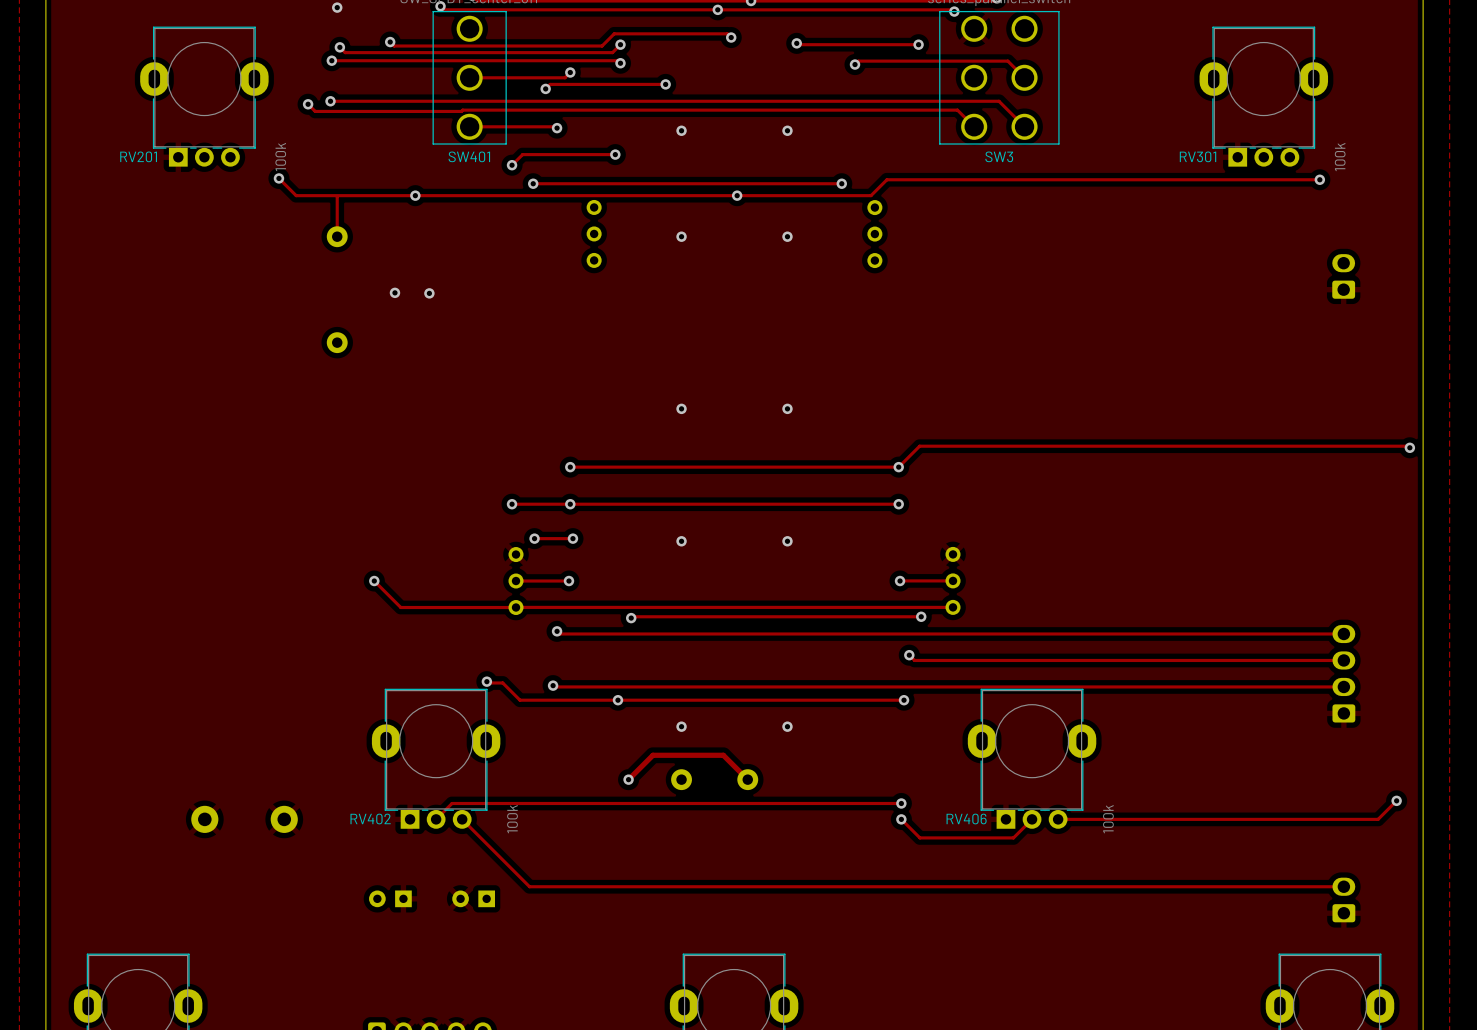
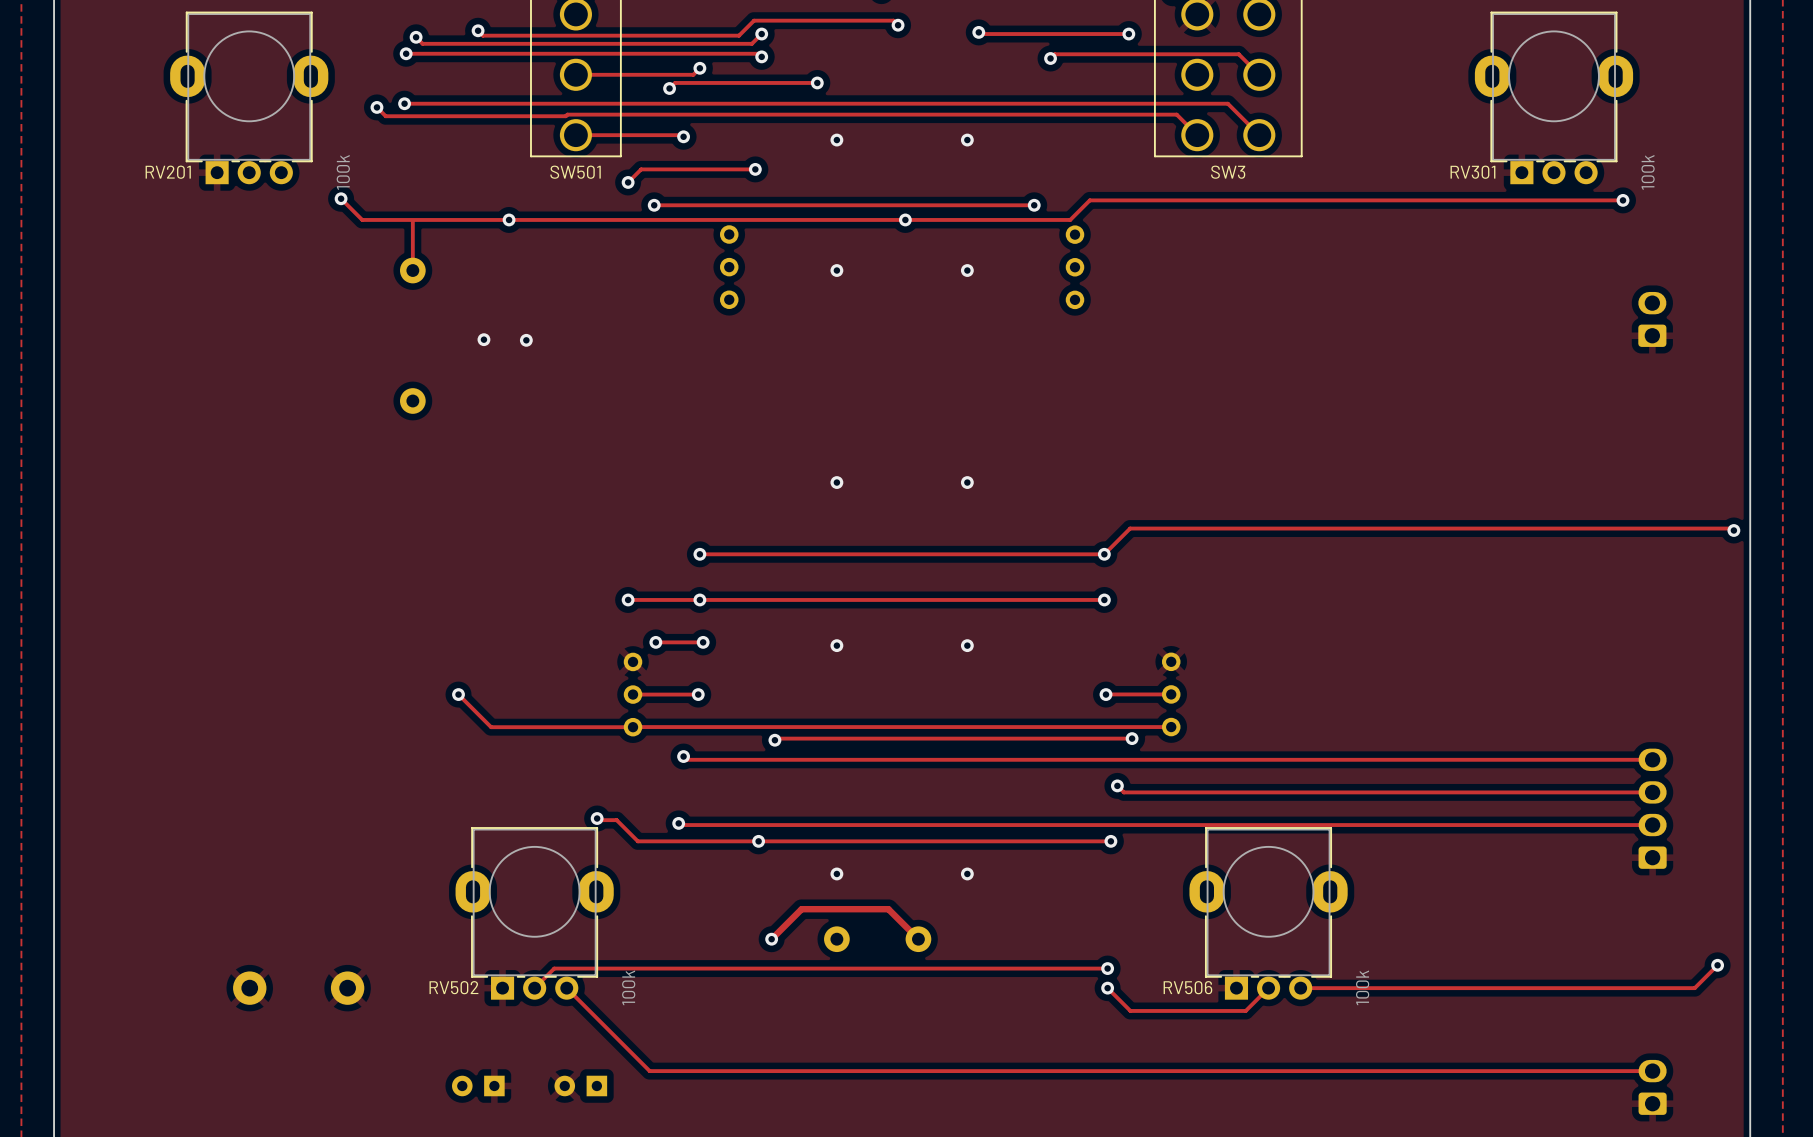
SW401 name: SW401 (469, 156) -> SW501 (575, 172)
RV402 name: RV402 (370, 819) -> RV502 (453, 987)
RV406 name: RV406 (966, 819) -> RV506 (1187, 987)

